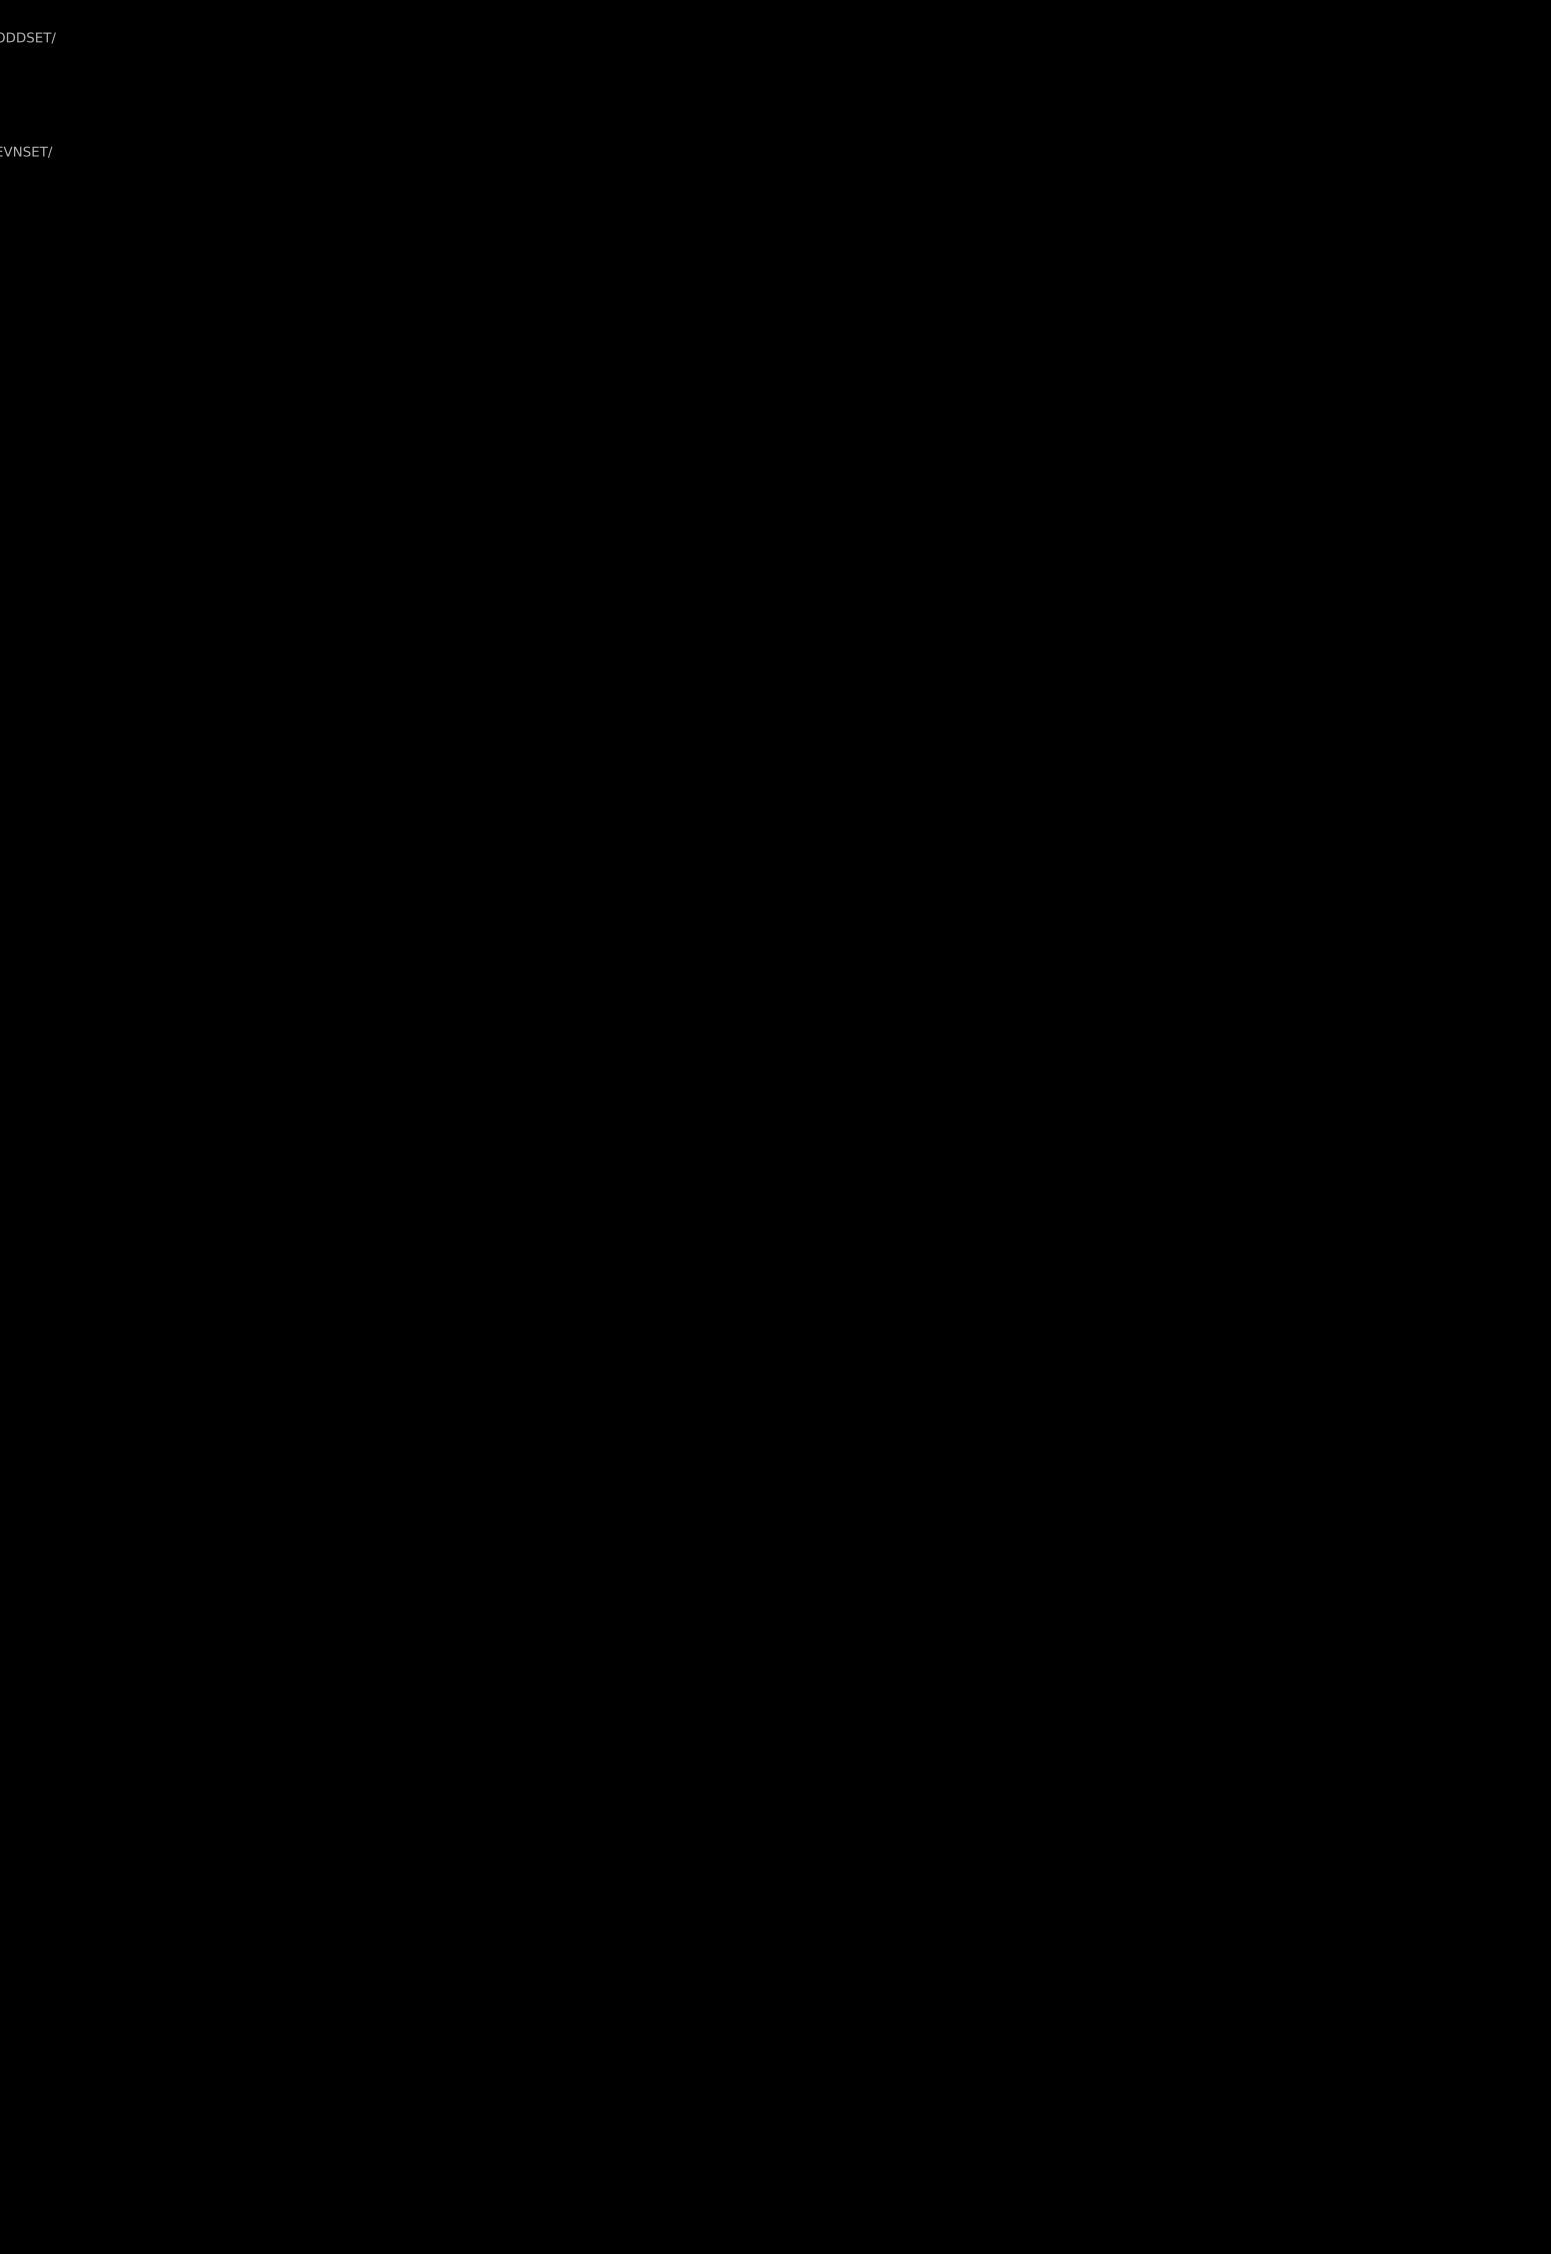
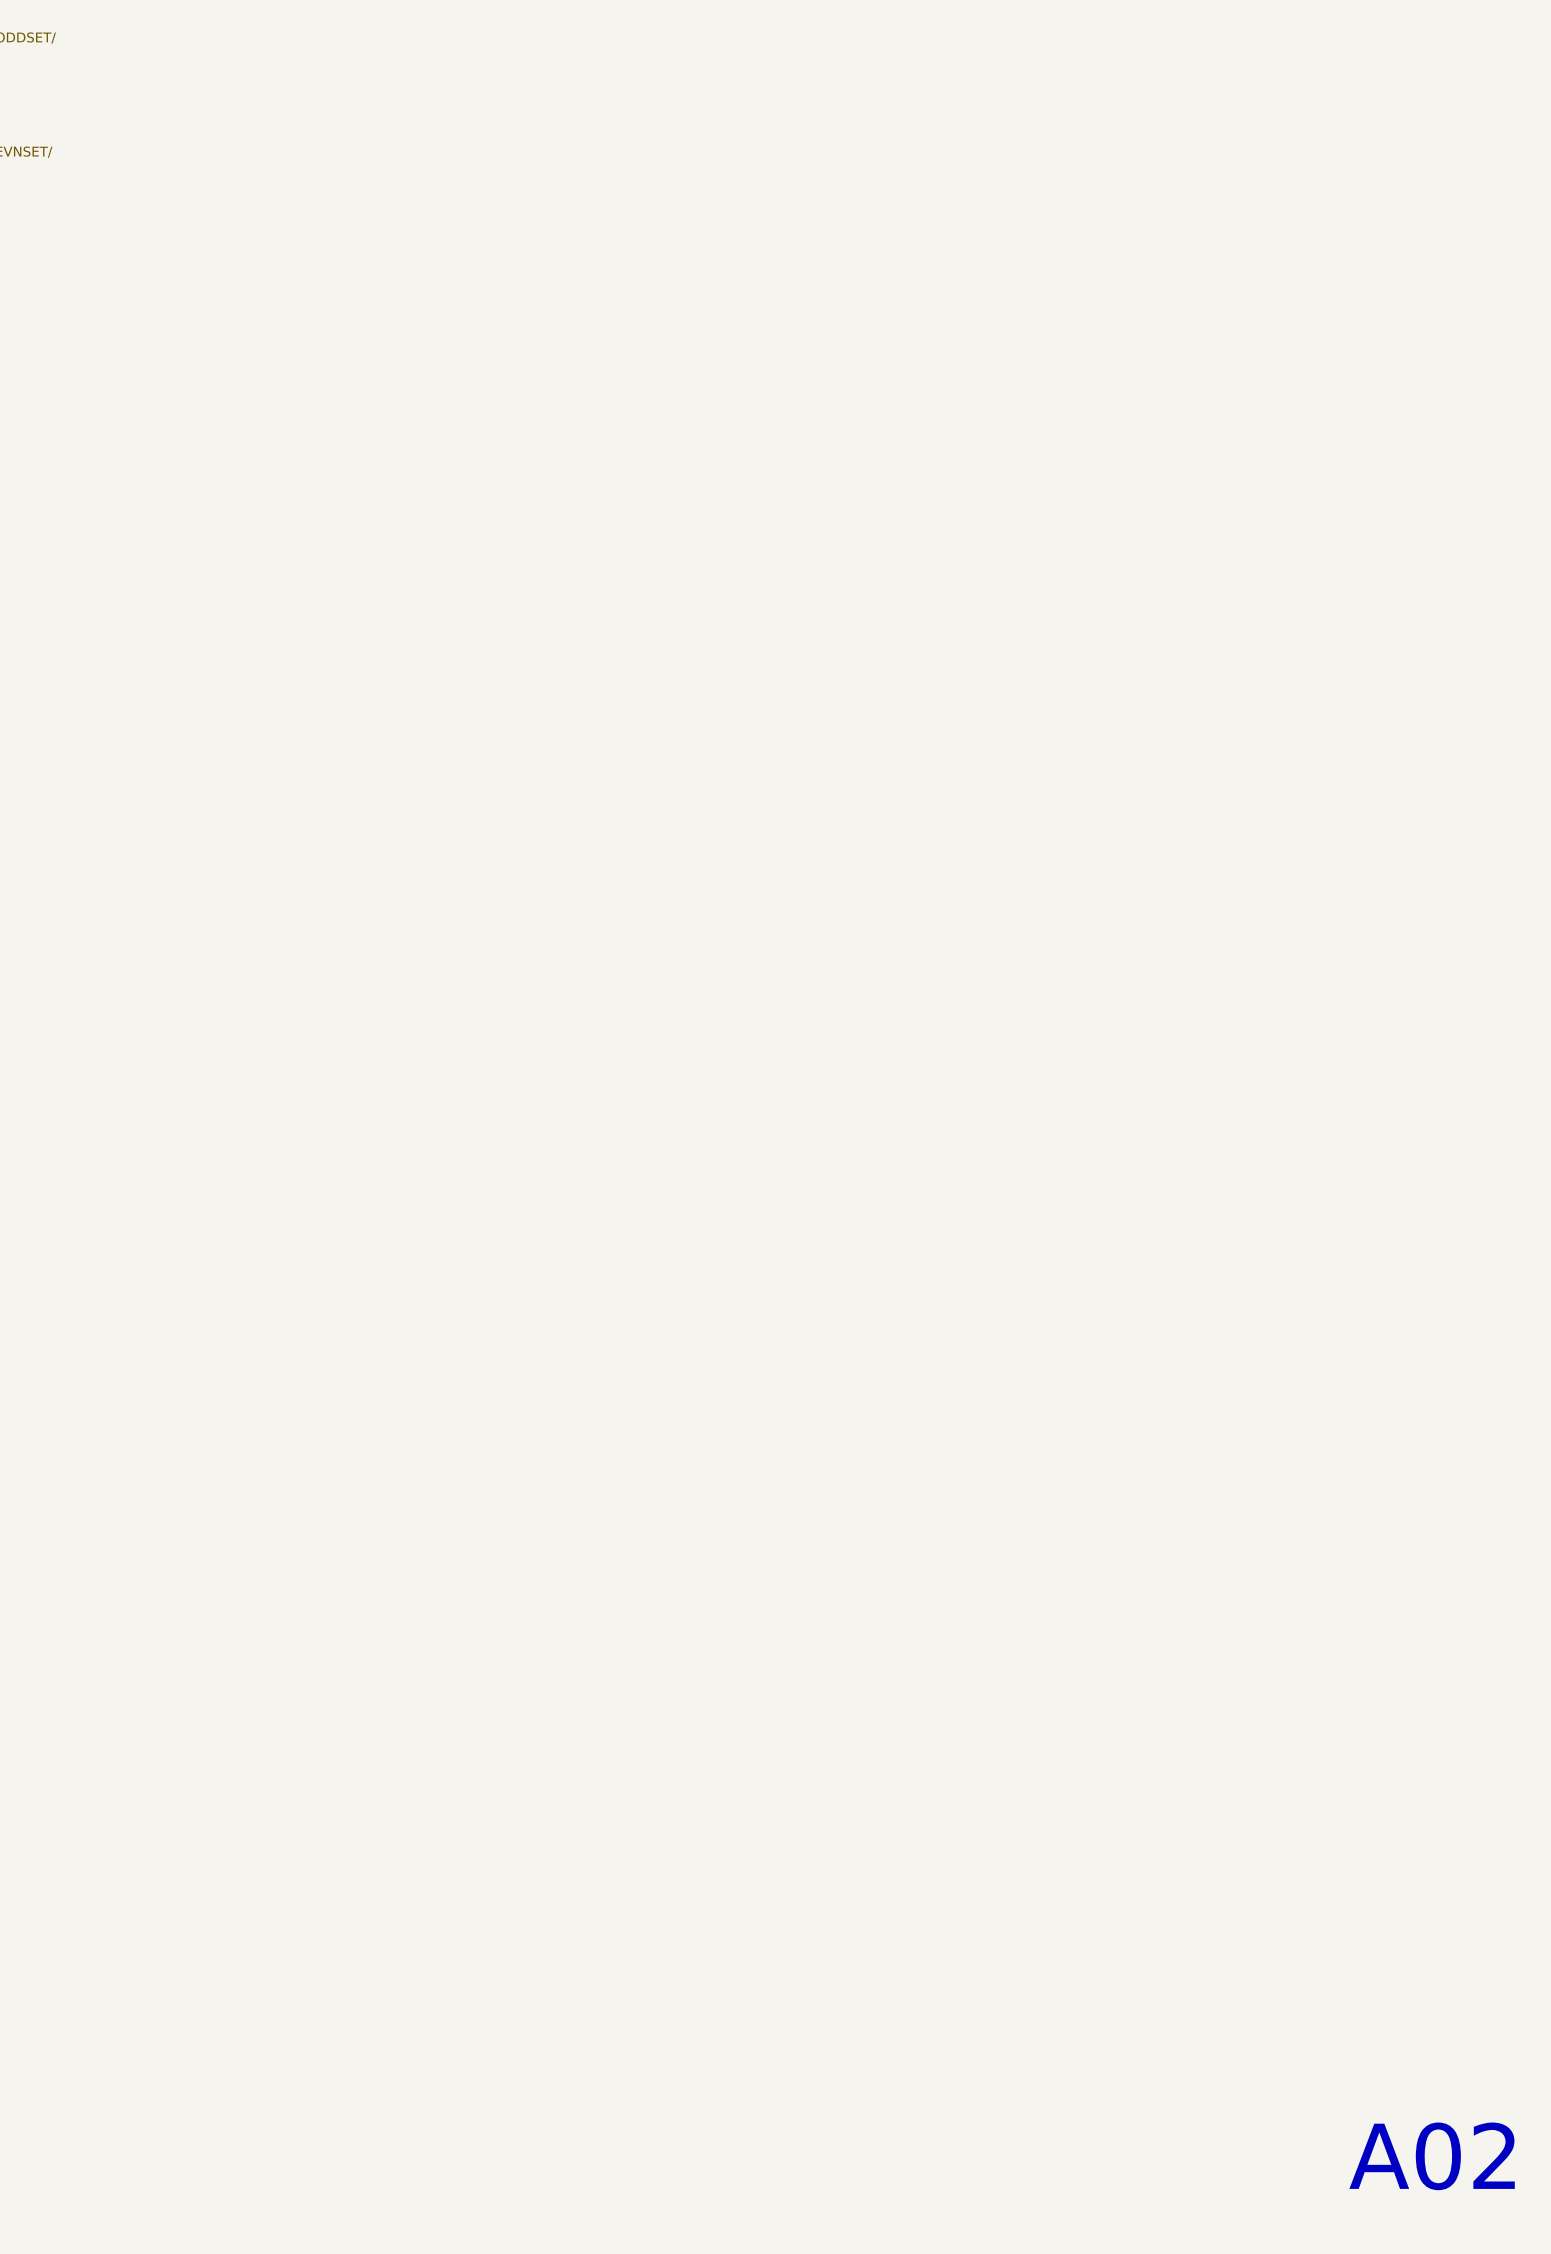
text: none -> A02 (1432, 2156)

